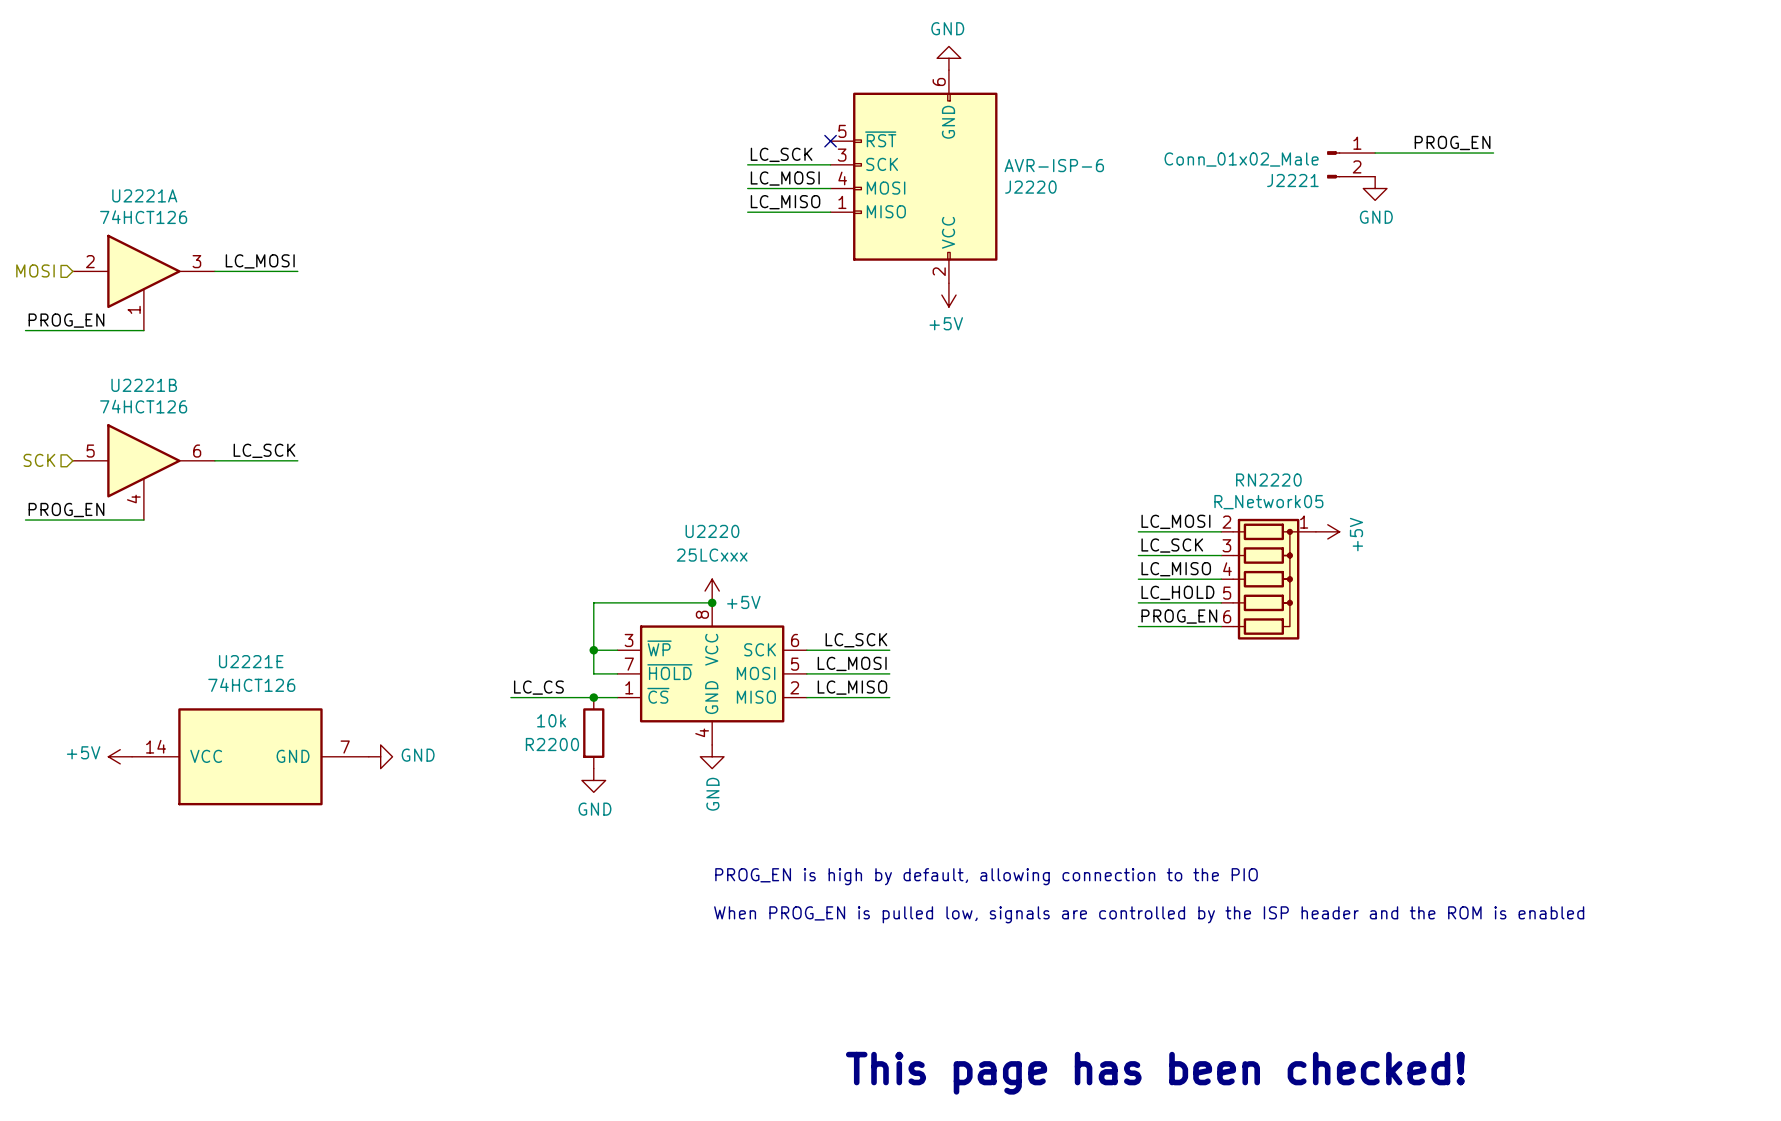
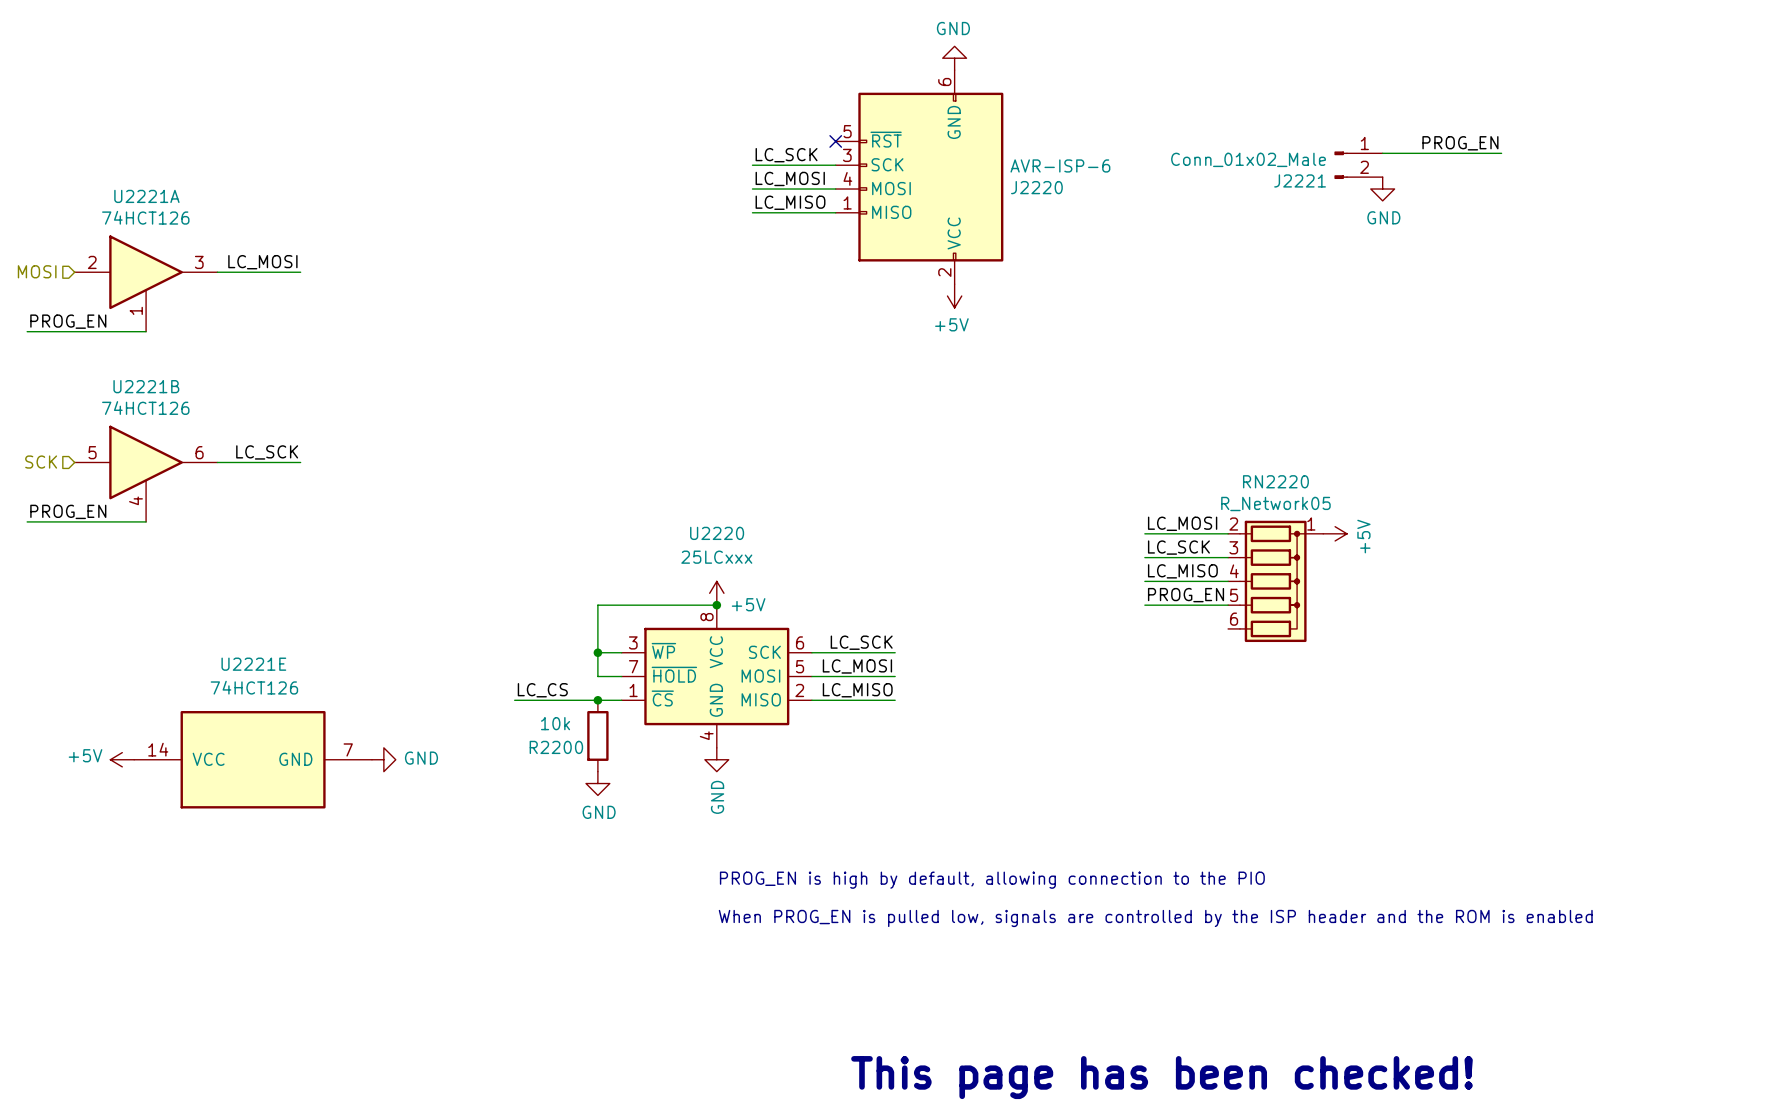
label: LC_HOLD (1177, 592) -> PROG_EN (1186, 595)
label: PROG_EN (1179, 616) -> none
wire: (1138, 626) (1221, 626) -> none

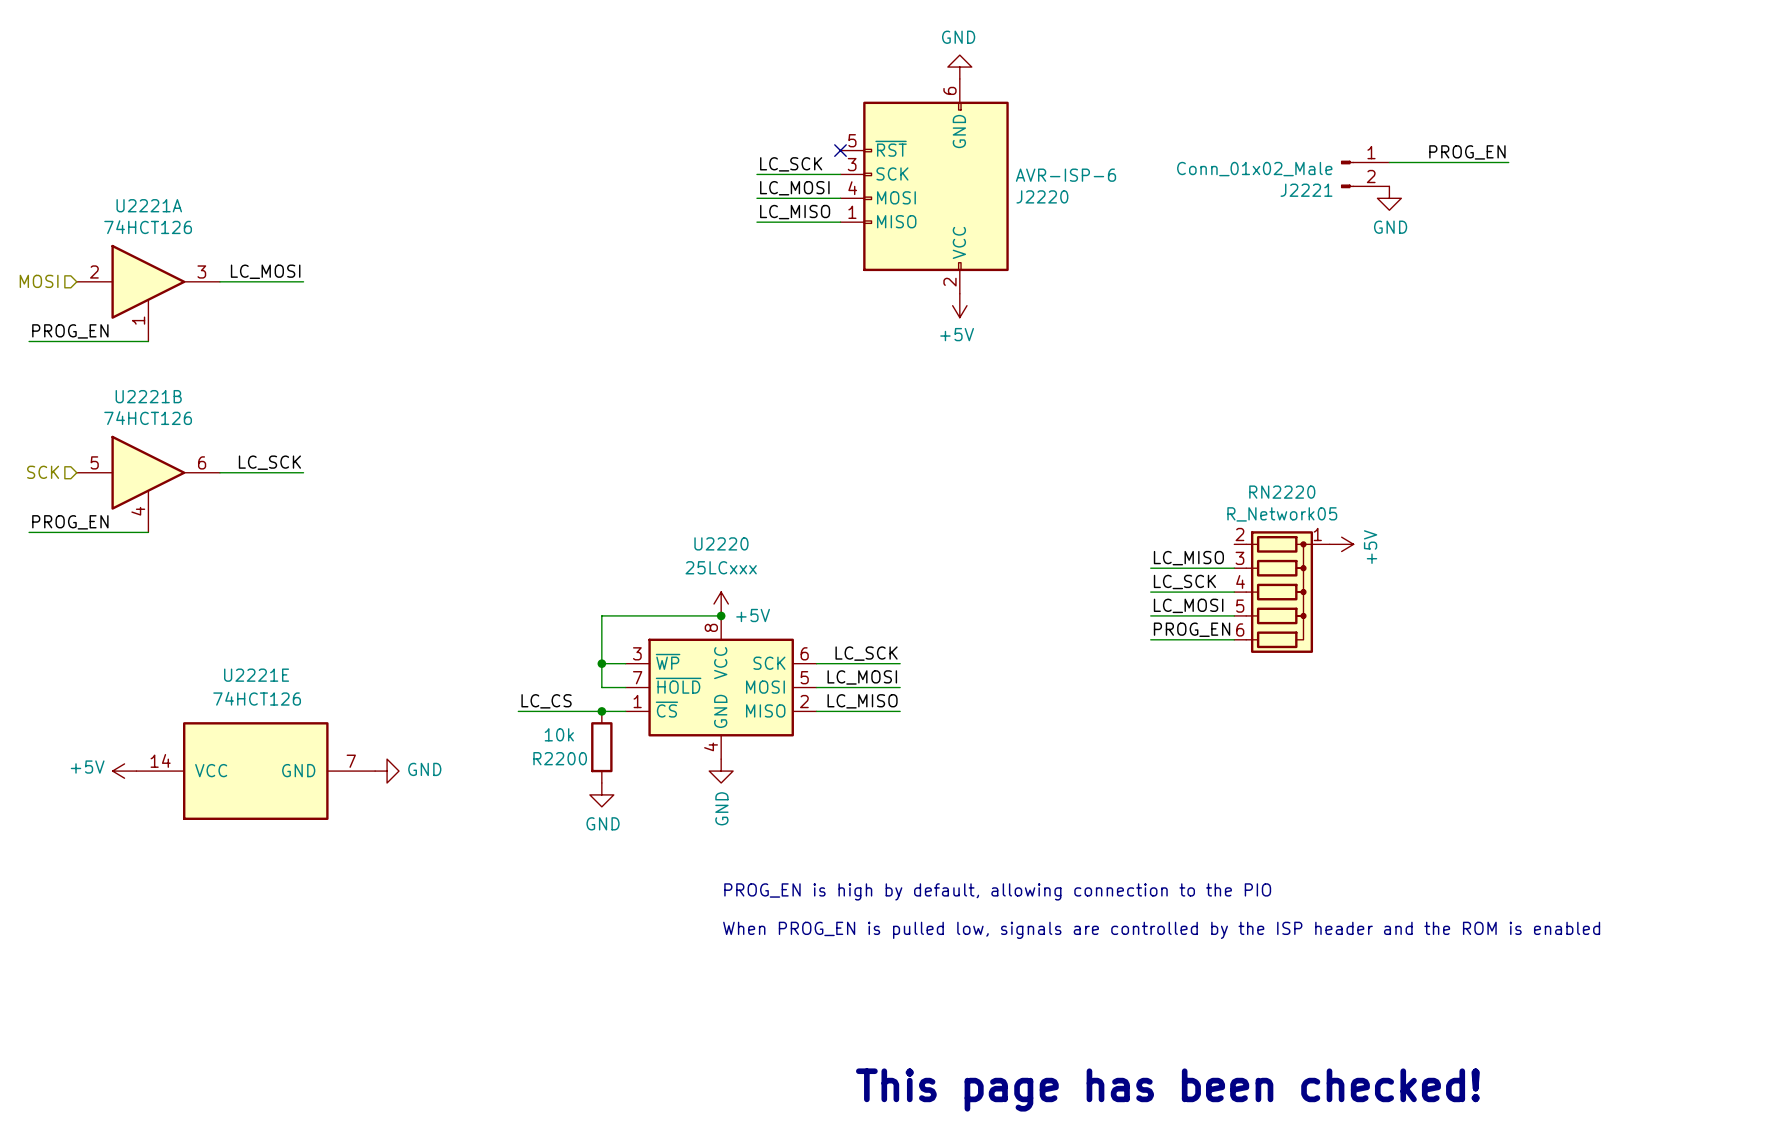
label: LC_MOSI (1182, 523) -> none
wire: (1144, 533) (1228, 533) -> (1150, 639) (1234, 639)
label: LC_SCK (1178, 547) -> LC_MISO (1188, 558)
label: LC_MISO (1182, 571) -> LC_SCK (1184, 581)
label: PROG_EN (1186, 595) -> LC_MOSI (1188, 605)
label: none -> PROG_EN (1192, 629)

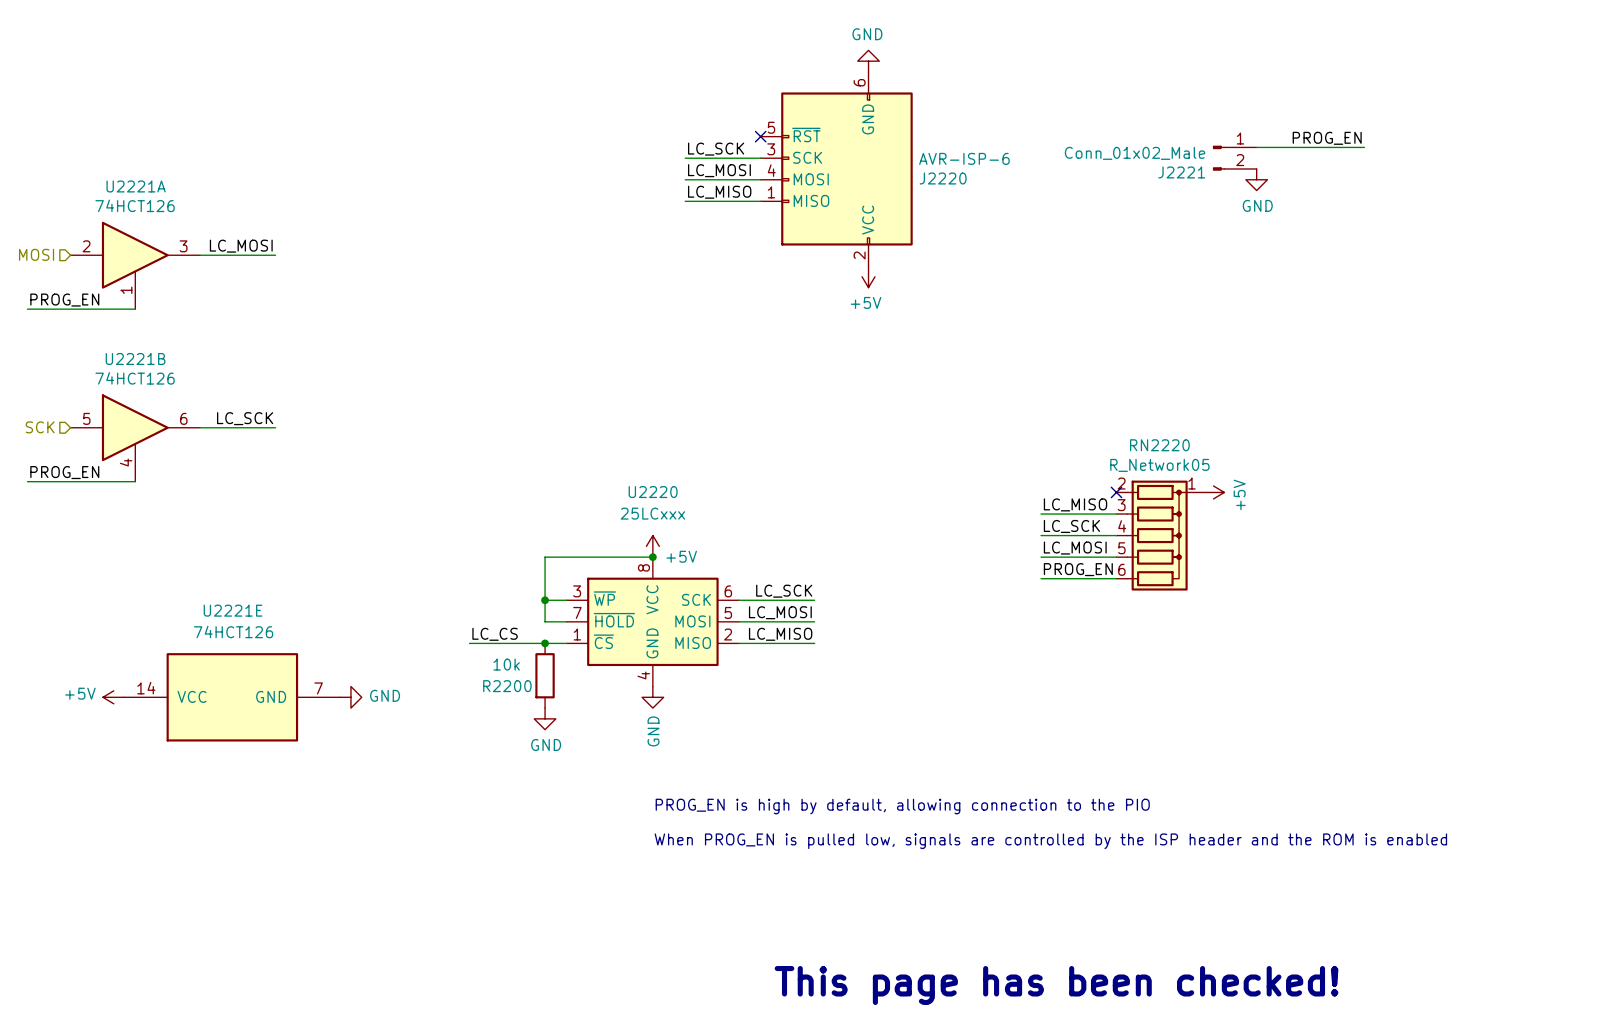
no-connect mark: none -> (1116, 492)

